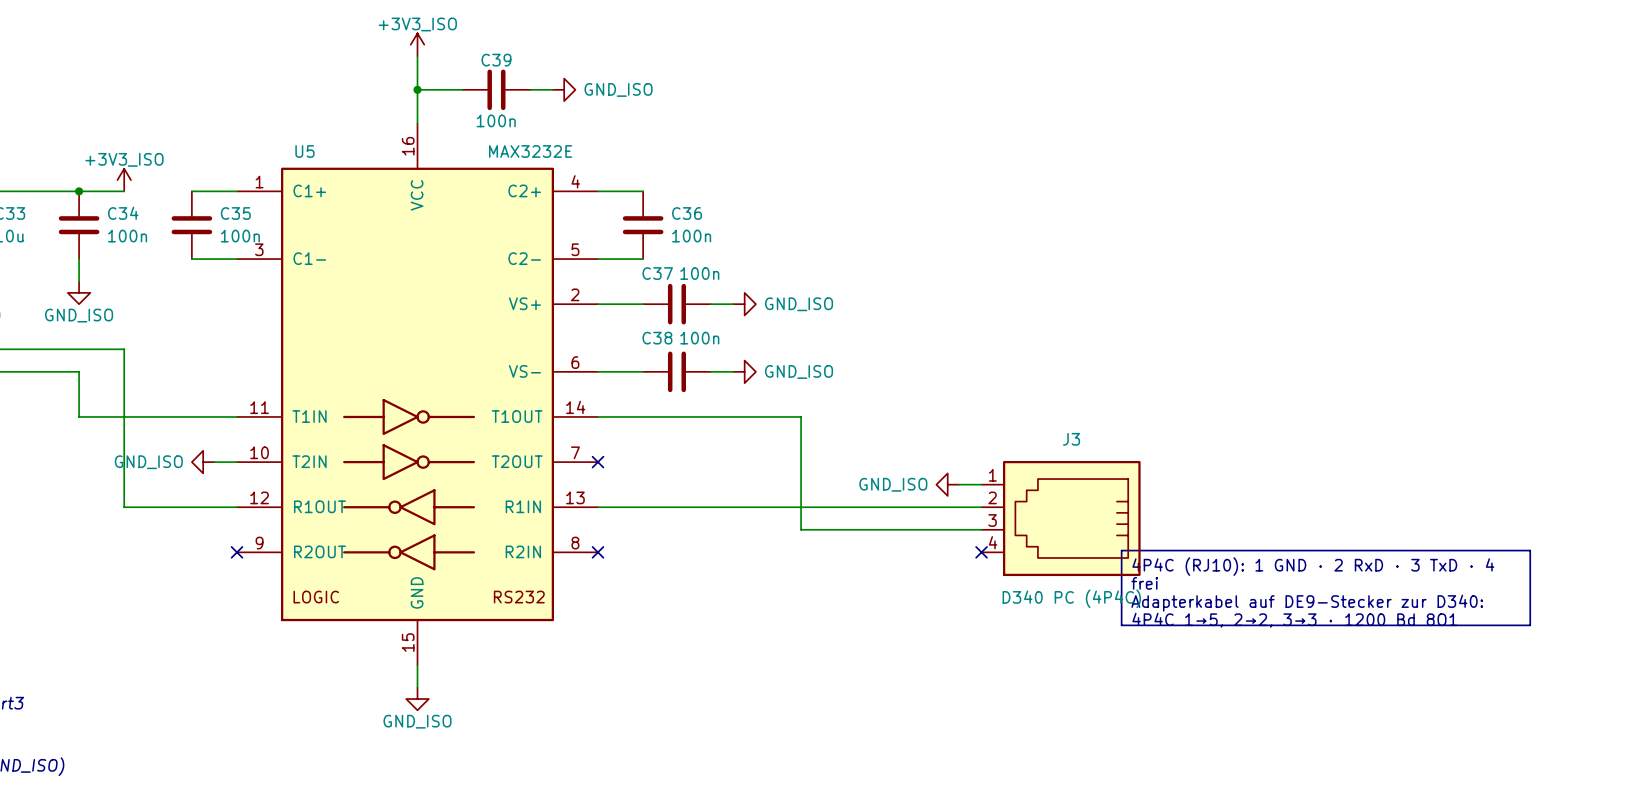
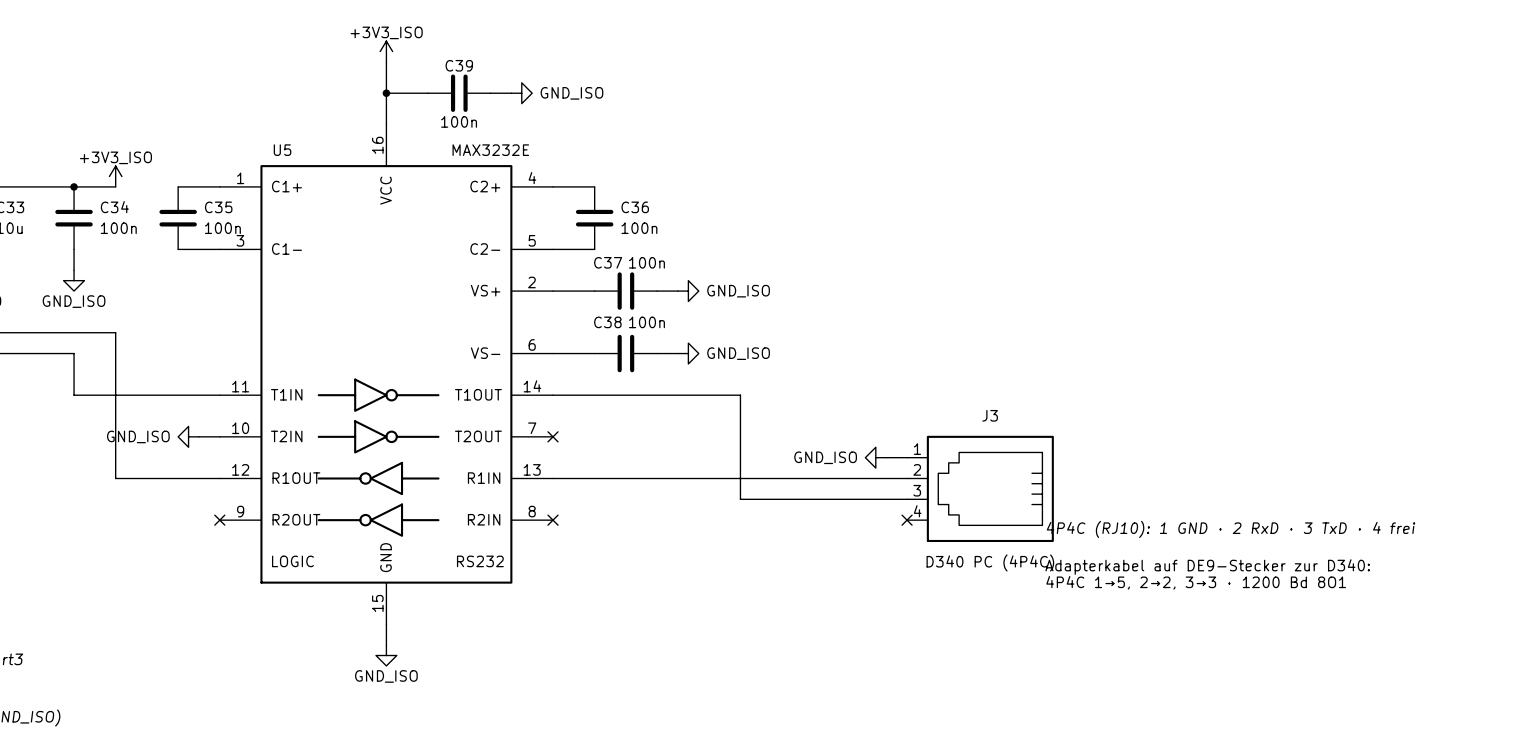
line: (1121, 550) (1530, 550) (1530, 625) (1121, 625) (1121, 550) -> none
text: 4P4C (RJ10): 1 GND · 2 RxD · 3 TxD · 4 (1313, 566) -> 4P4C (RJ10): 1 GND · 2 RxD · 3 TxD · 4 frei (1230, 529)
text: frei (1144, 583) -> none

